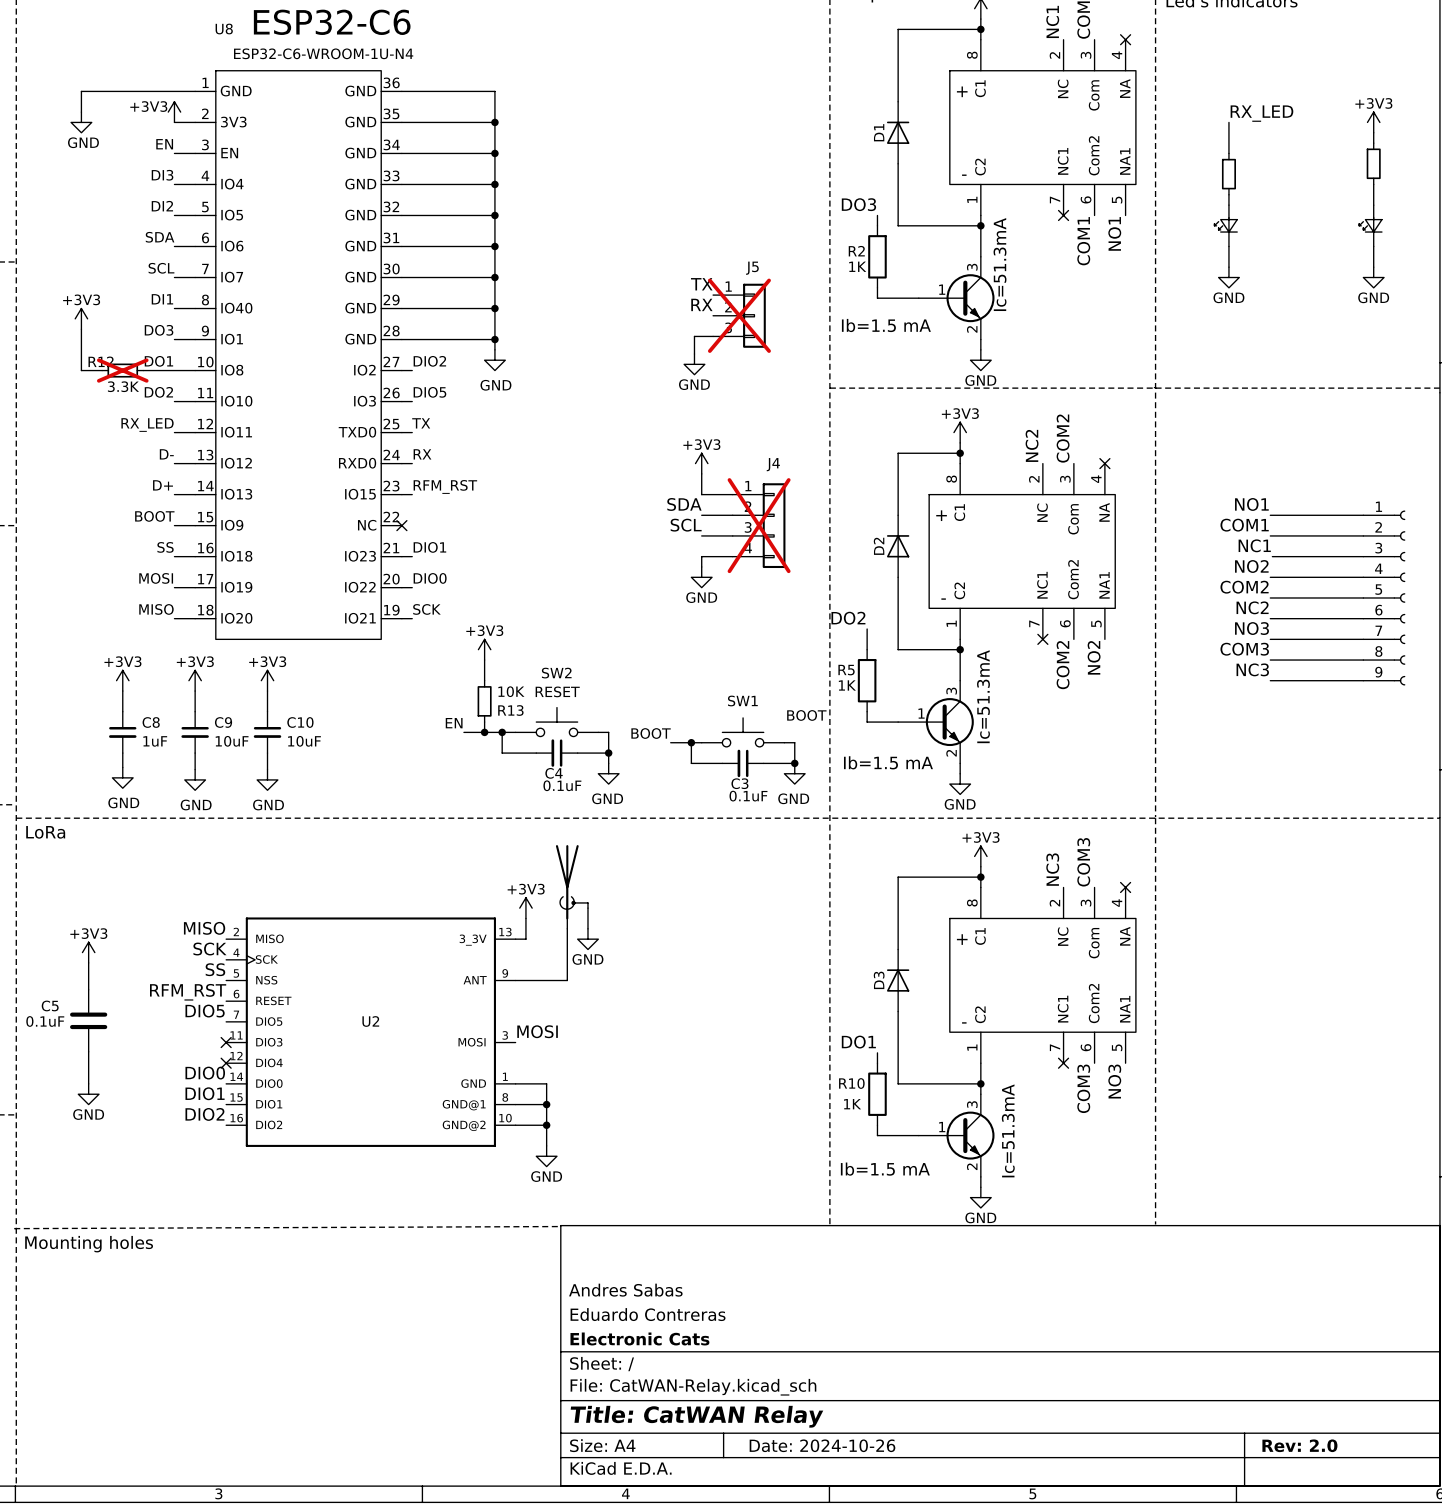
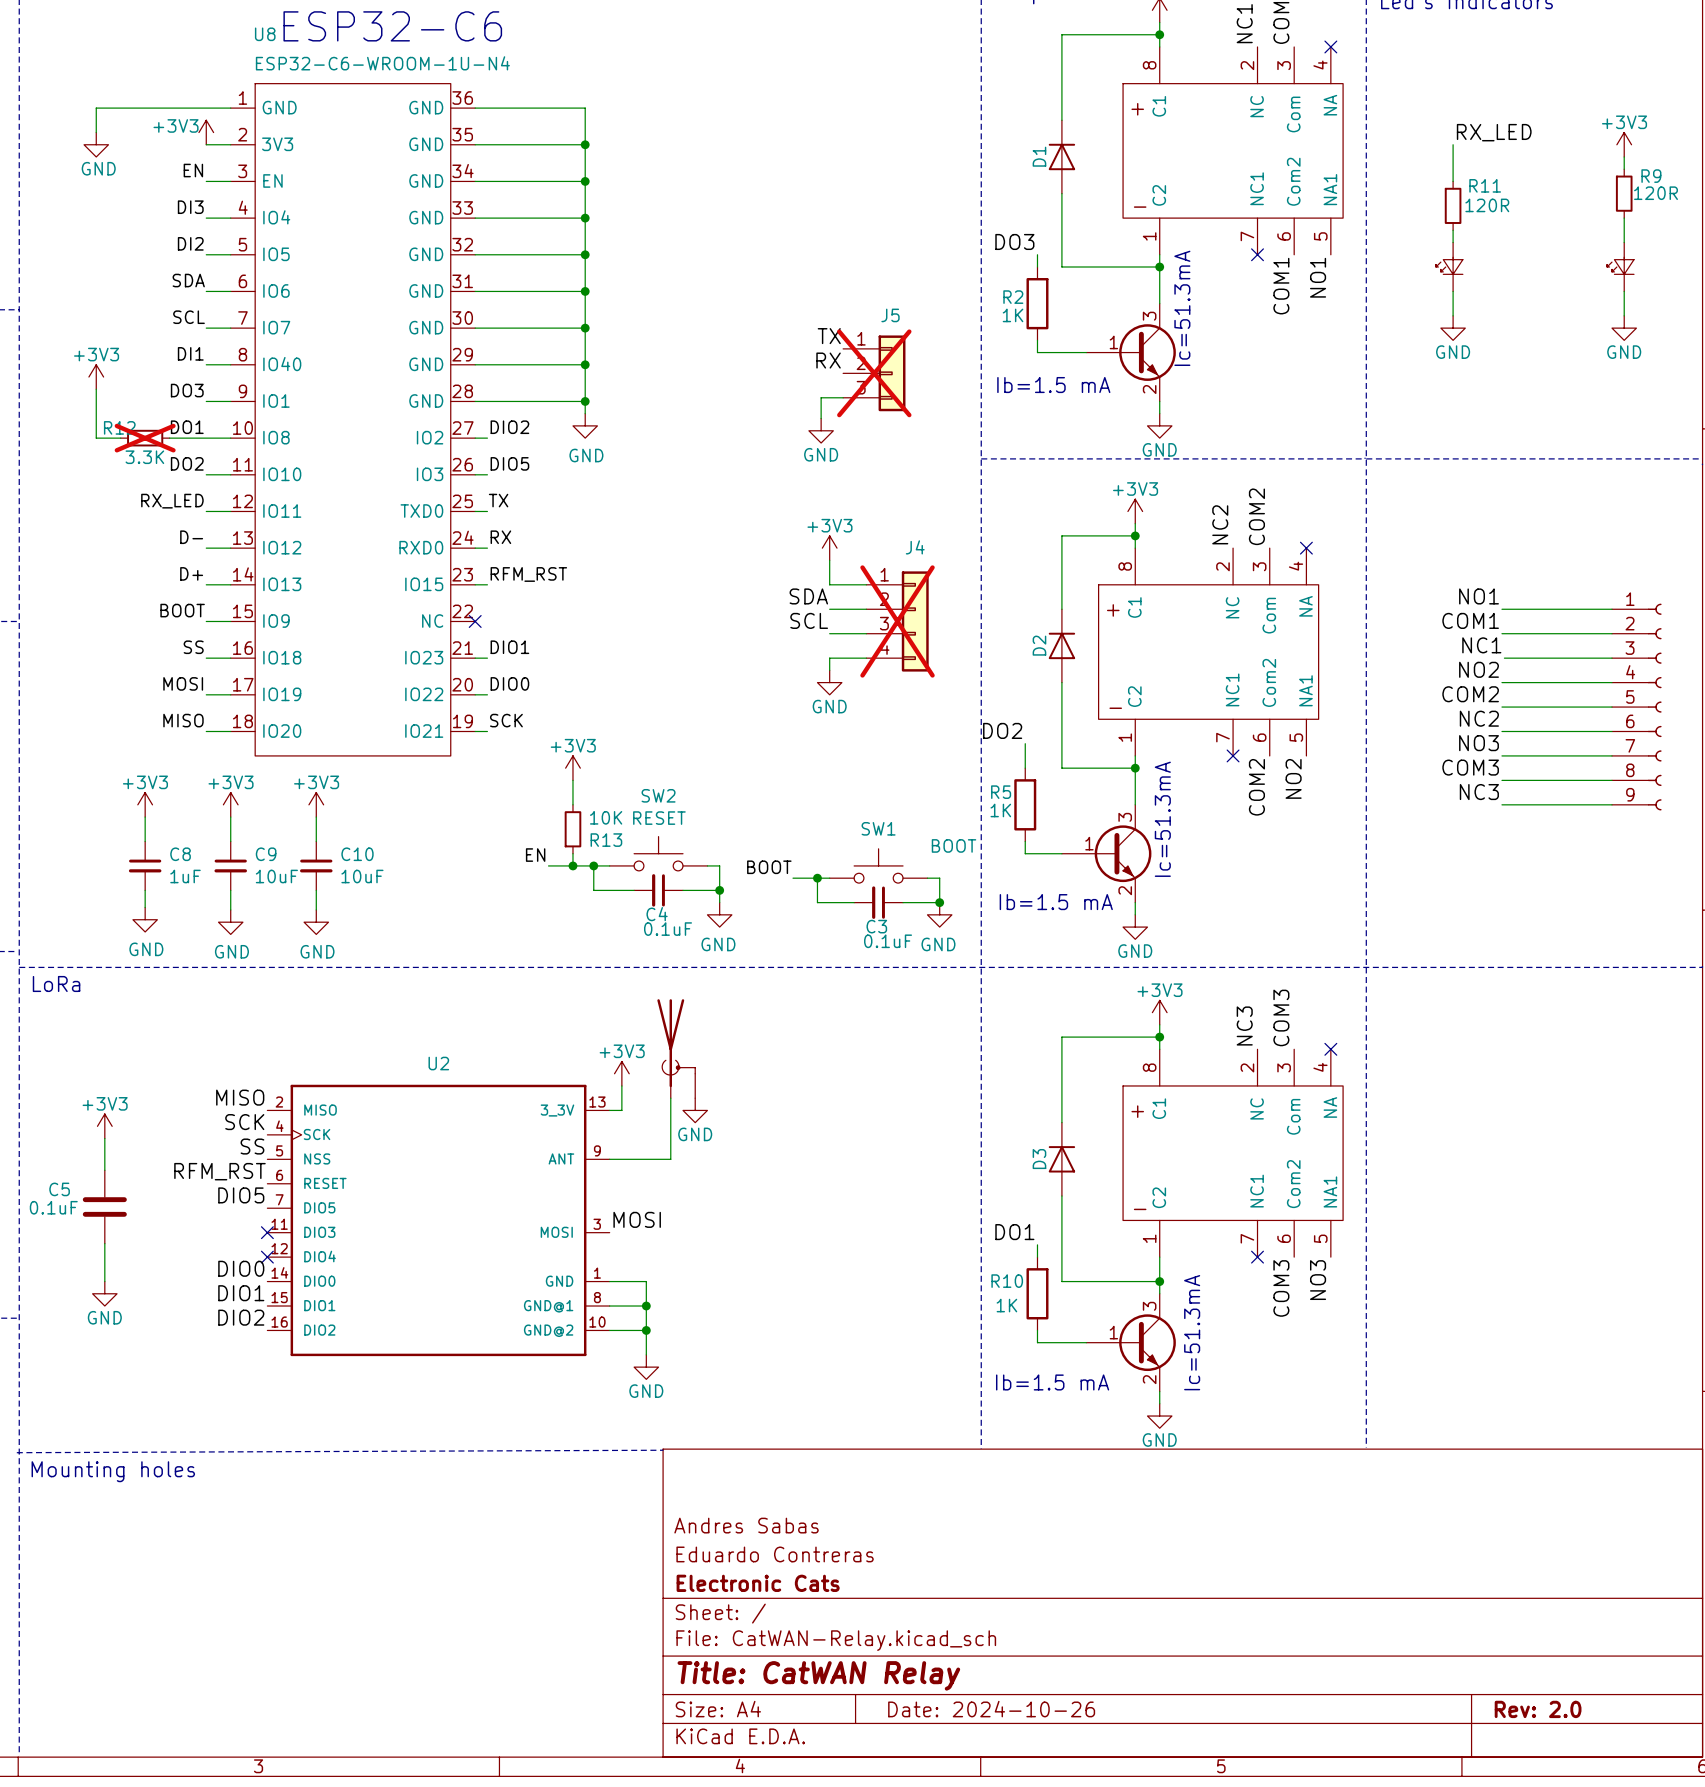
R9 name: none -> R9 (1651, 176)
R11 name: none -> R11 (1485, 185)
R9 value: none -> 120R (1656, 193)
R11 value: none -> 120R (1487, 205)
U2 name position: U2 (370, 1021) -> U2 (438, 1063)

